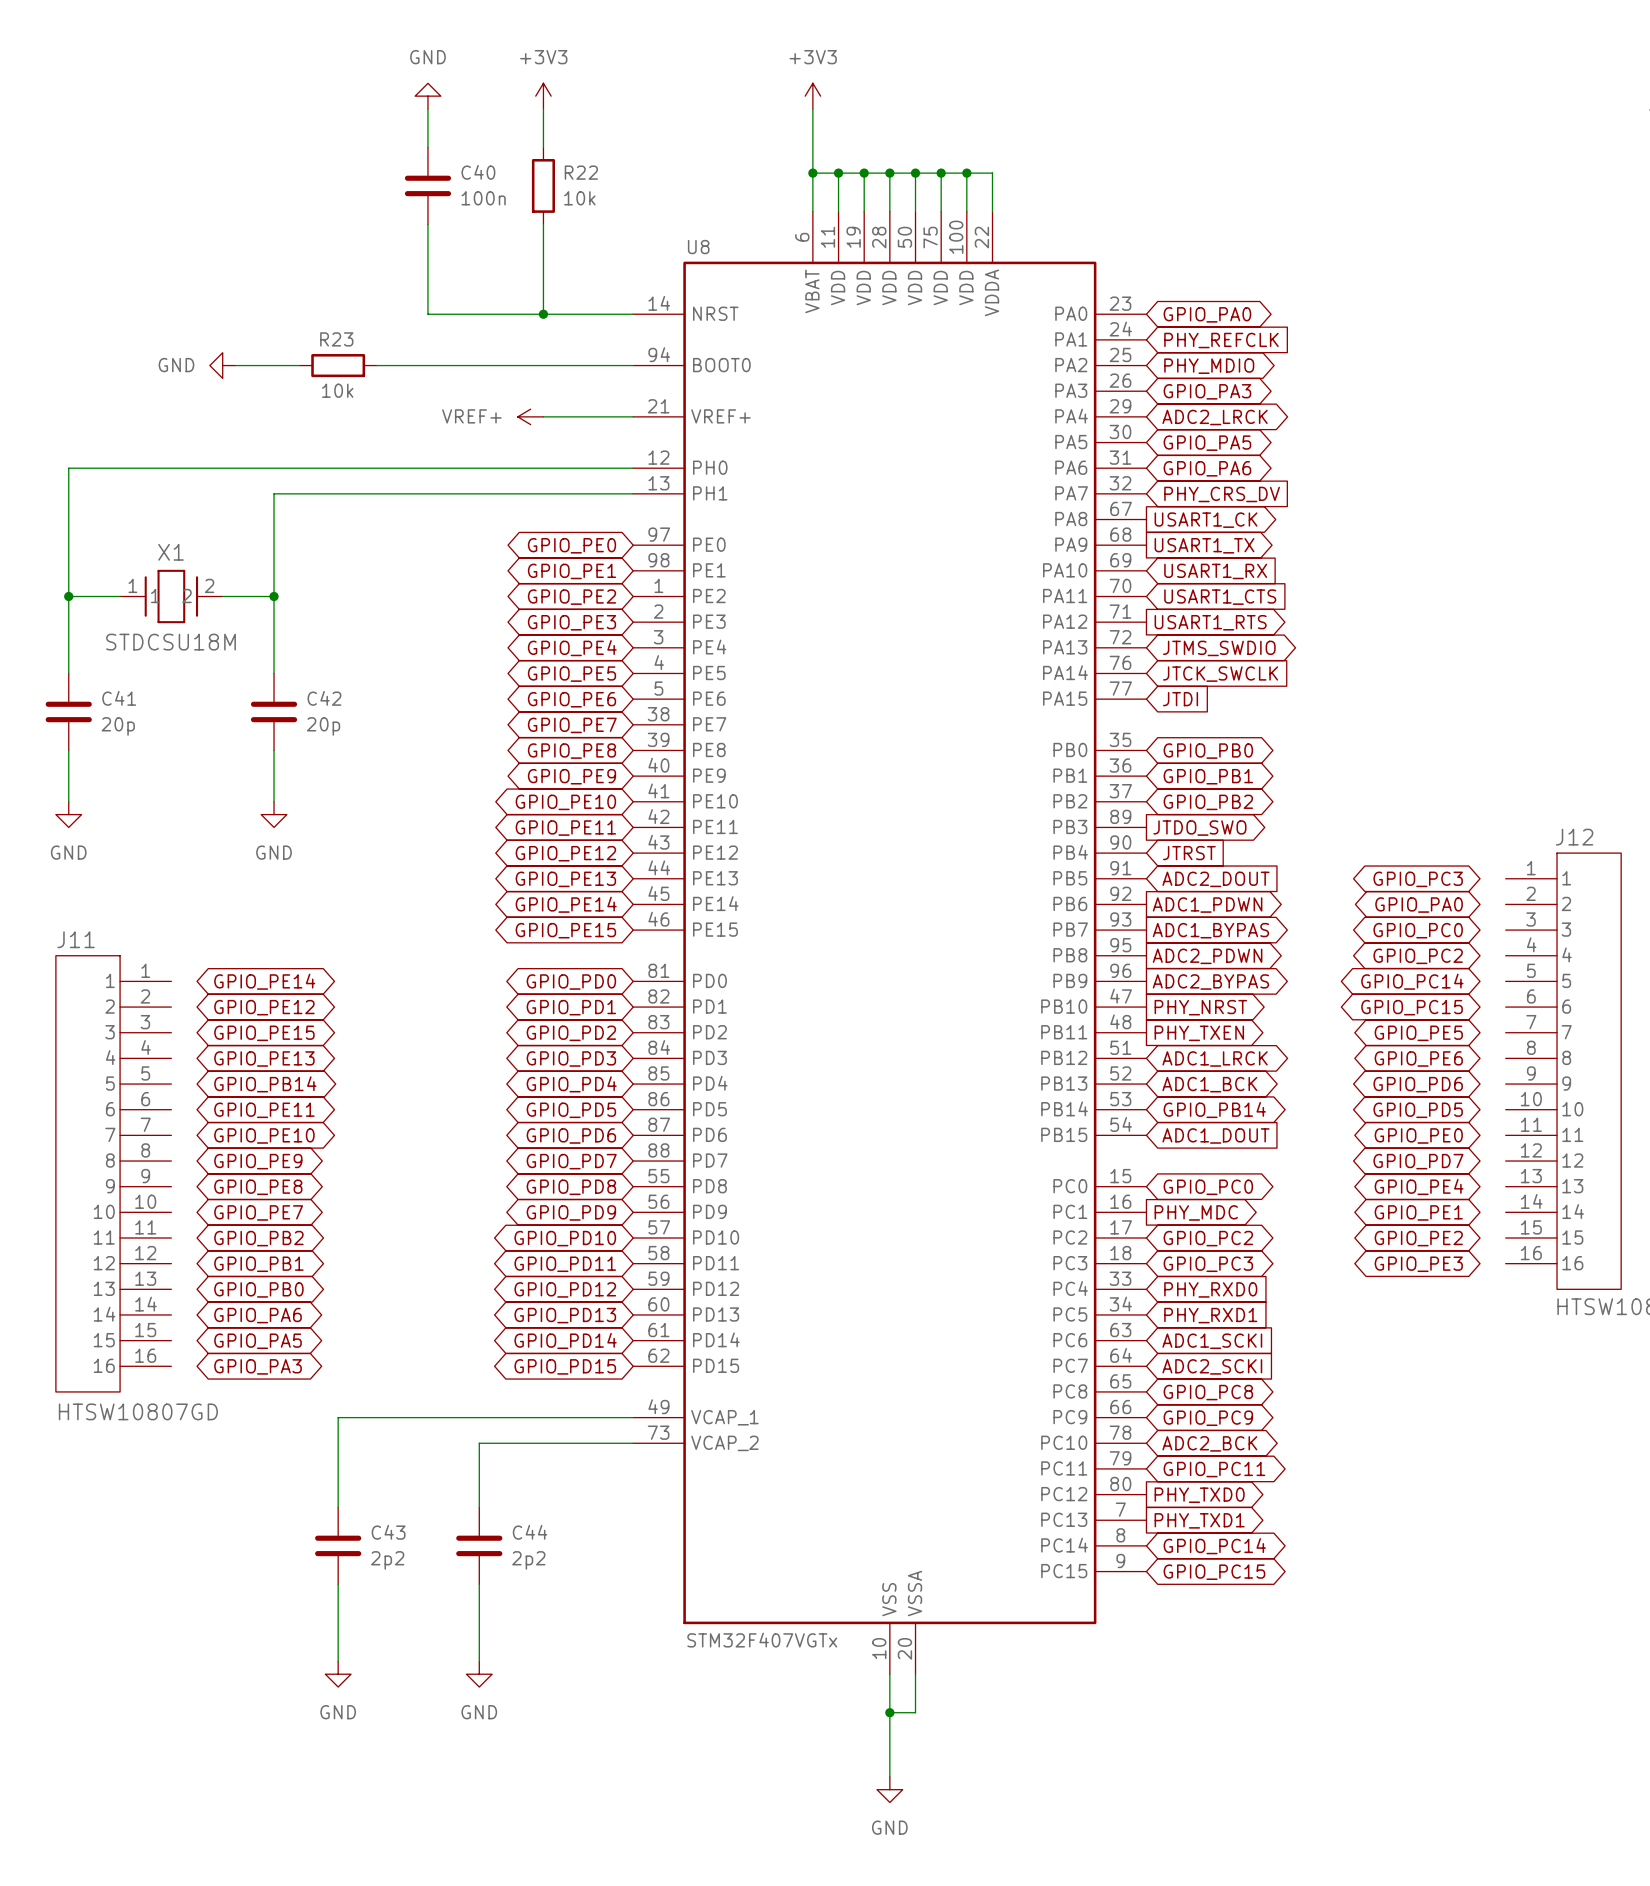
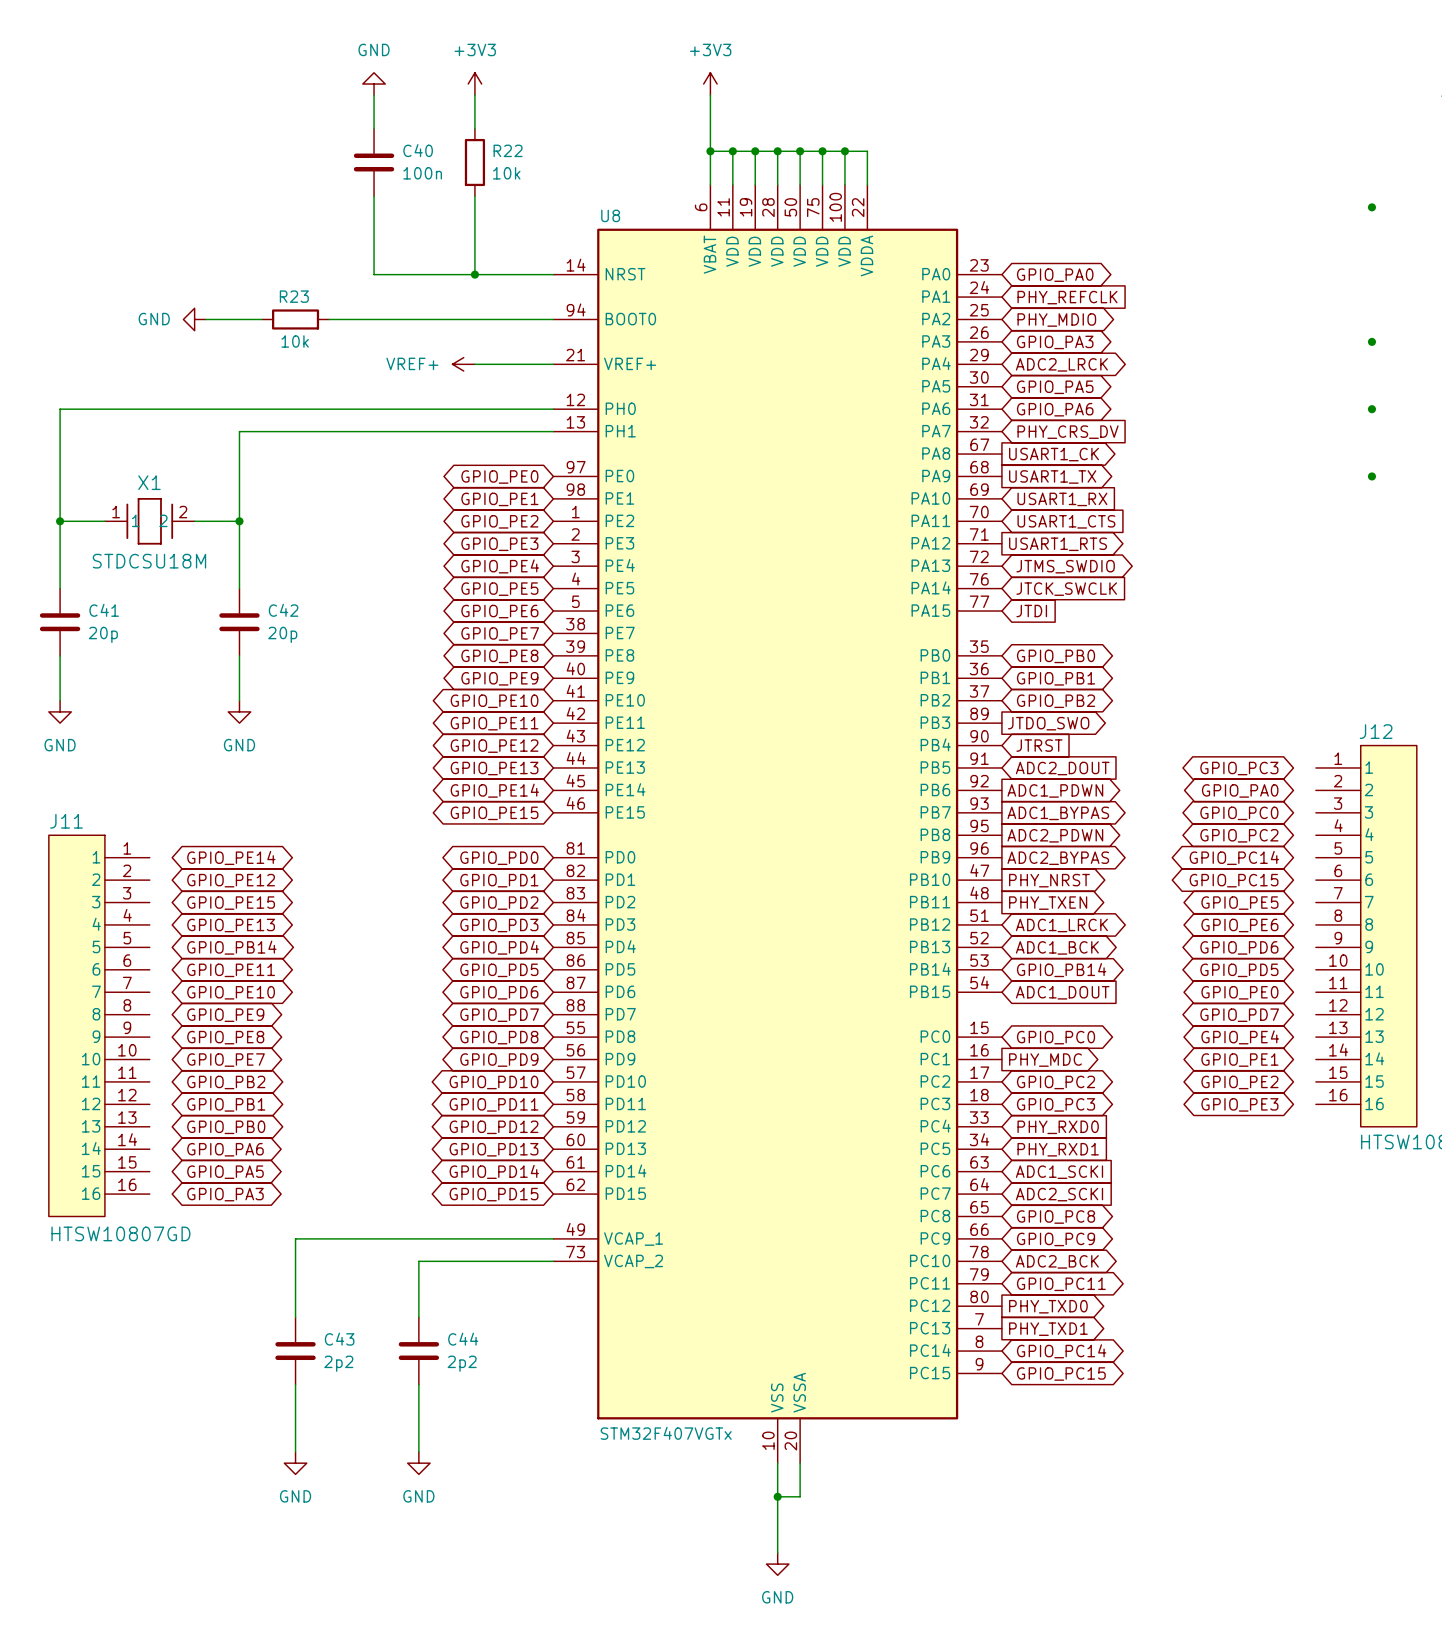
junction: none -> (1371, 207)
junction: none -> (1371, 341)
junction: none -> (1371, 409)
junction: none -> (1371, 476)

